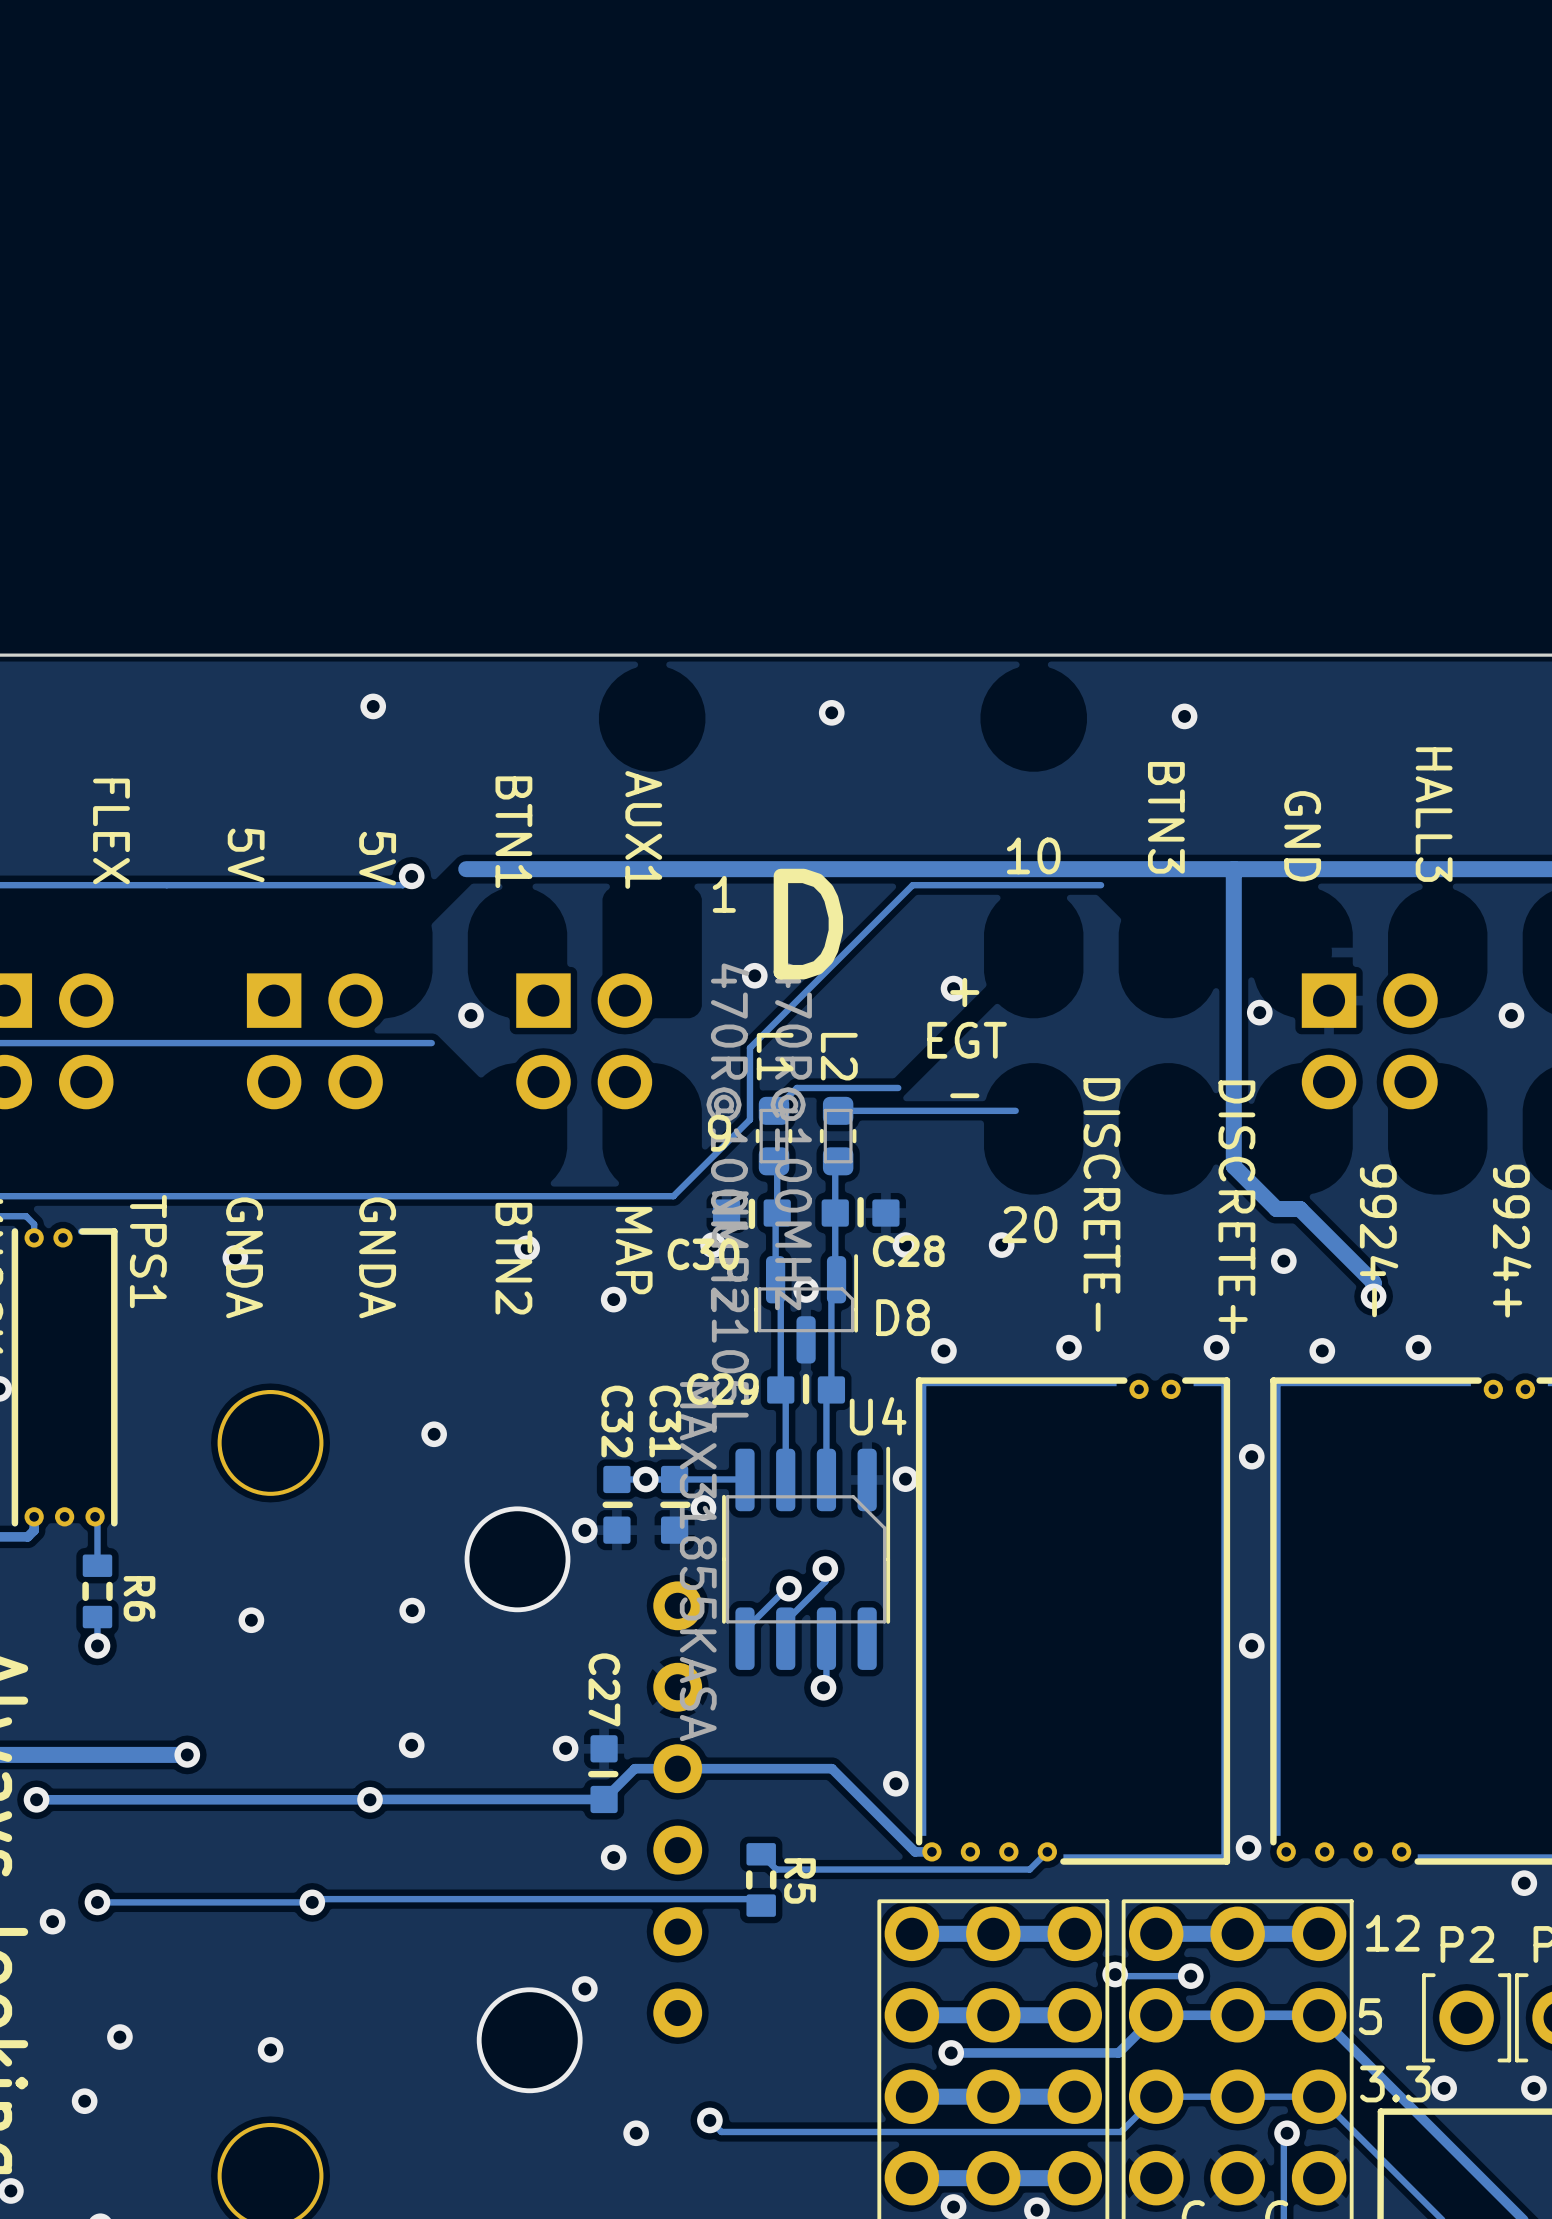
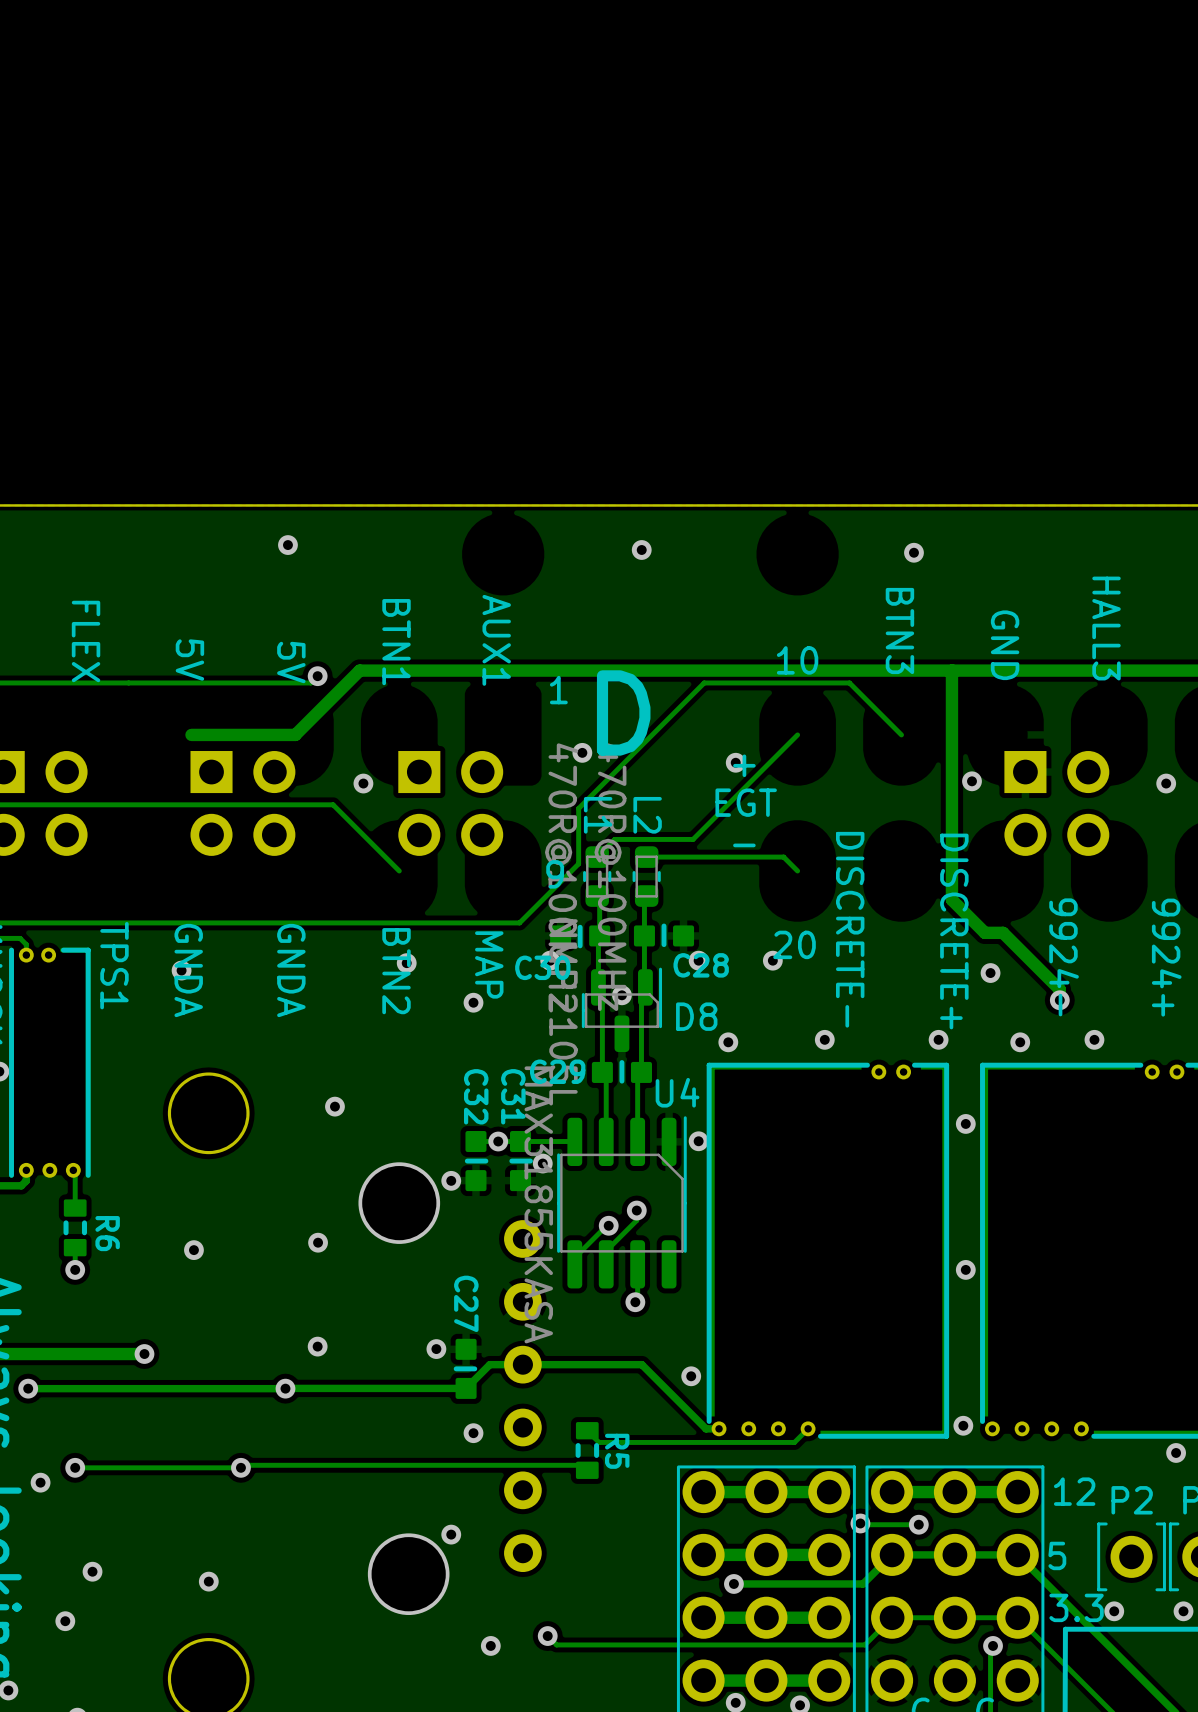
track: none -> (359, 670) (295, 734) (191, 734)
track: none -> (849, 682) (901, 734)
track: none -> (797, 734) (693, 839)
track: none -> (333, 804) (399, 870)
track: none -> (783, 857) (797, 870)

